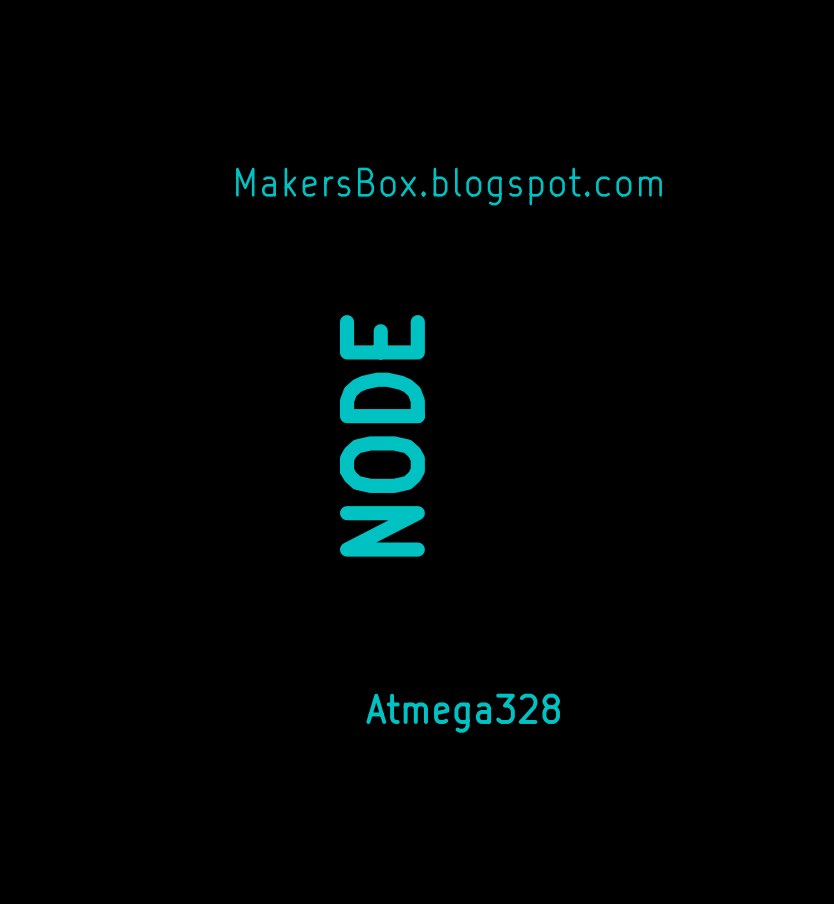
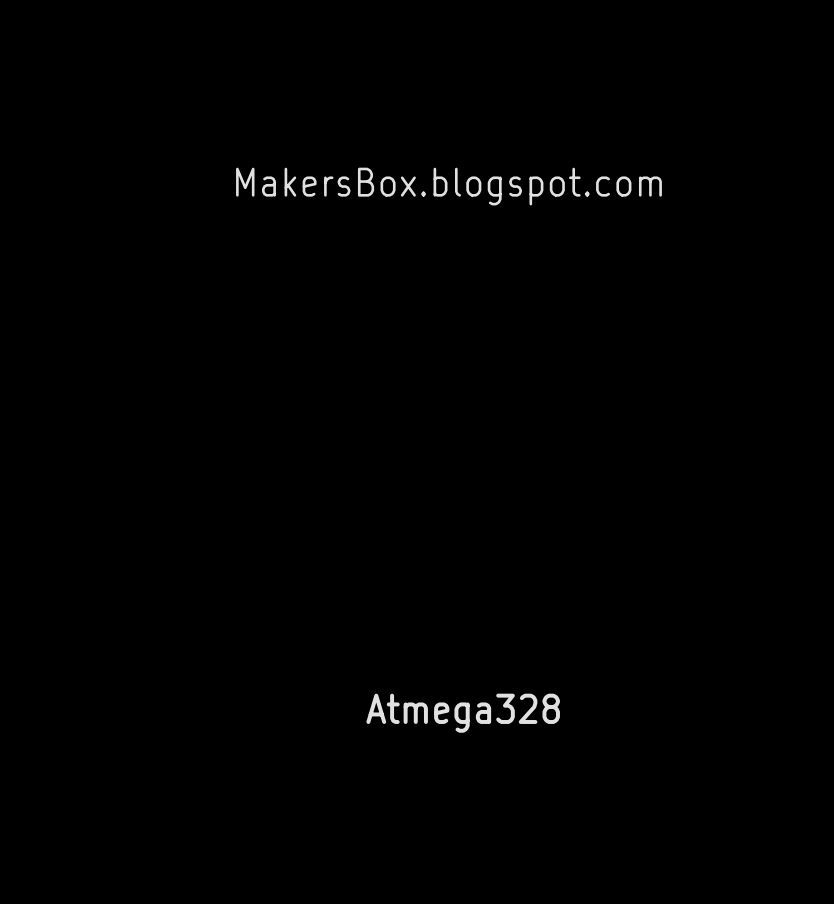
text: NODE (382, 435) -> none

